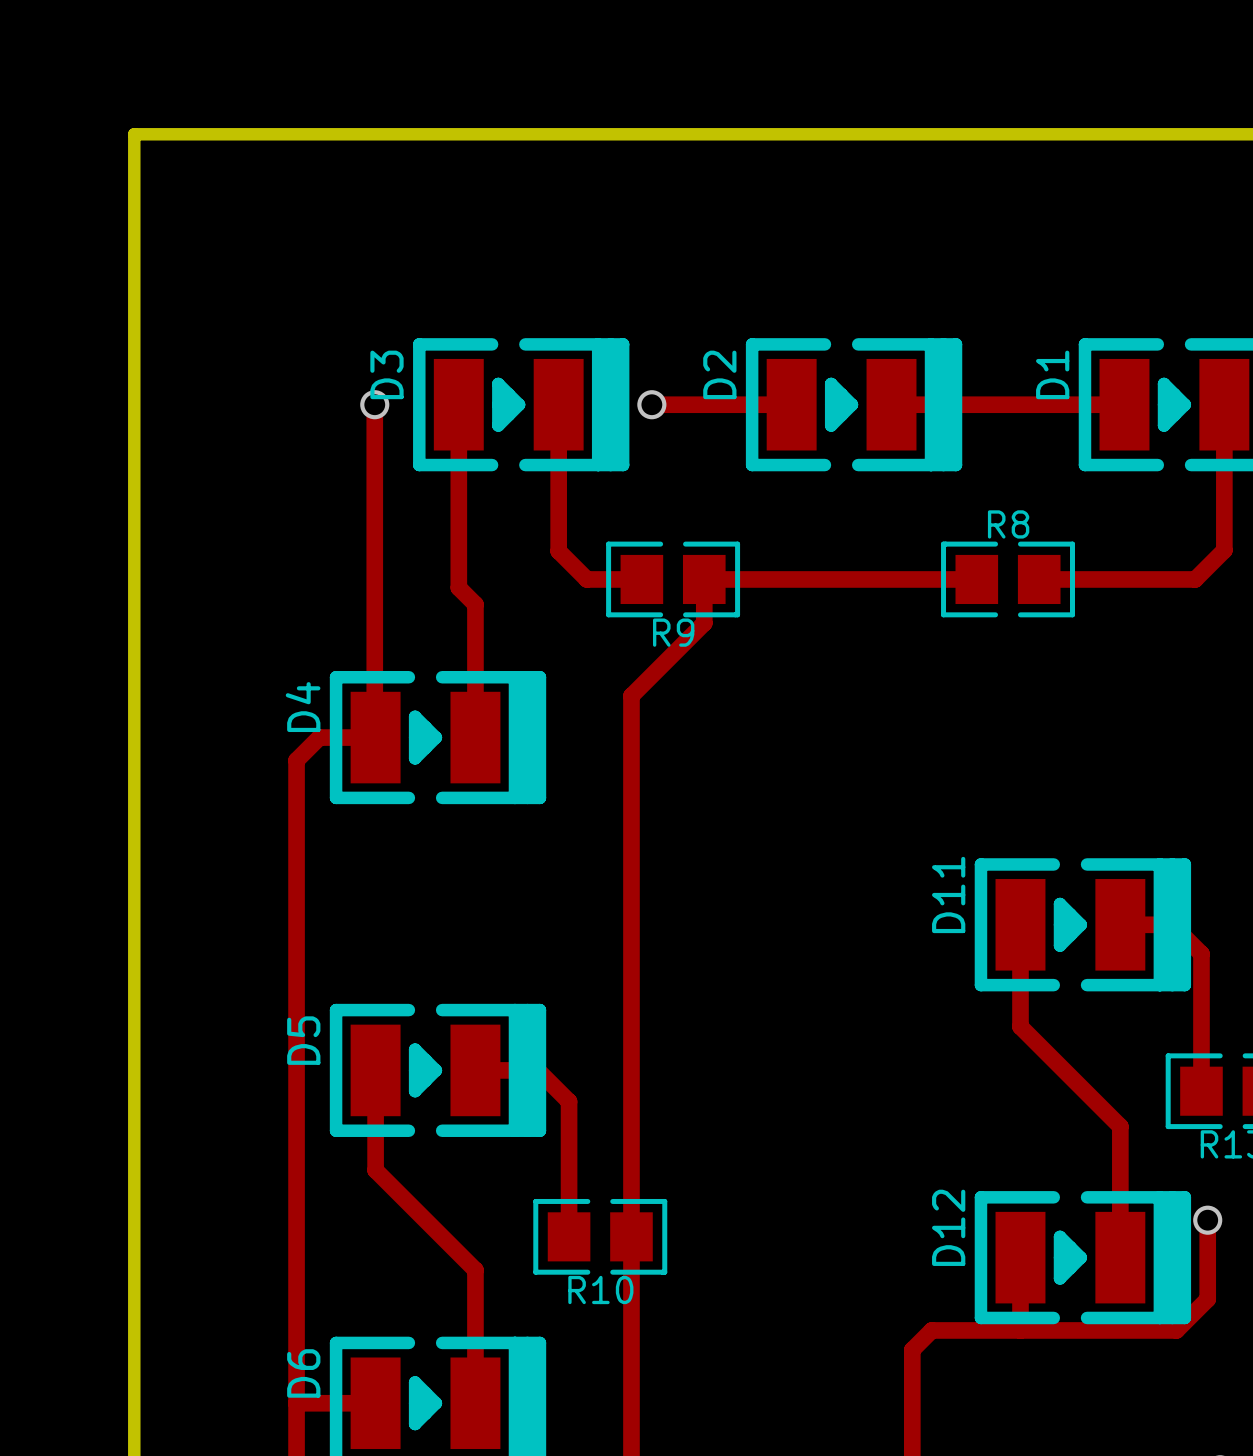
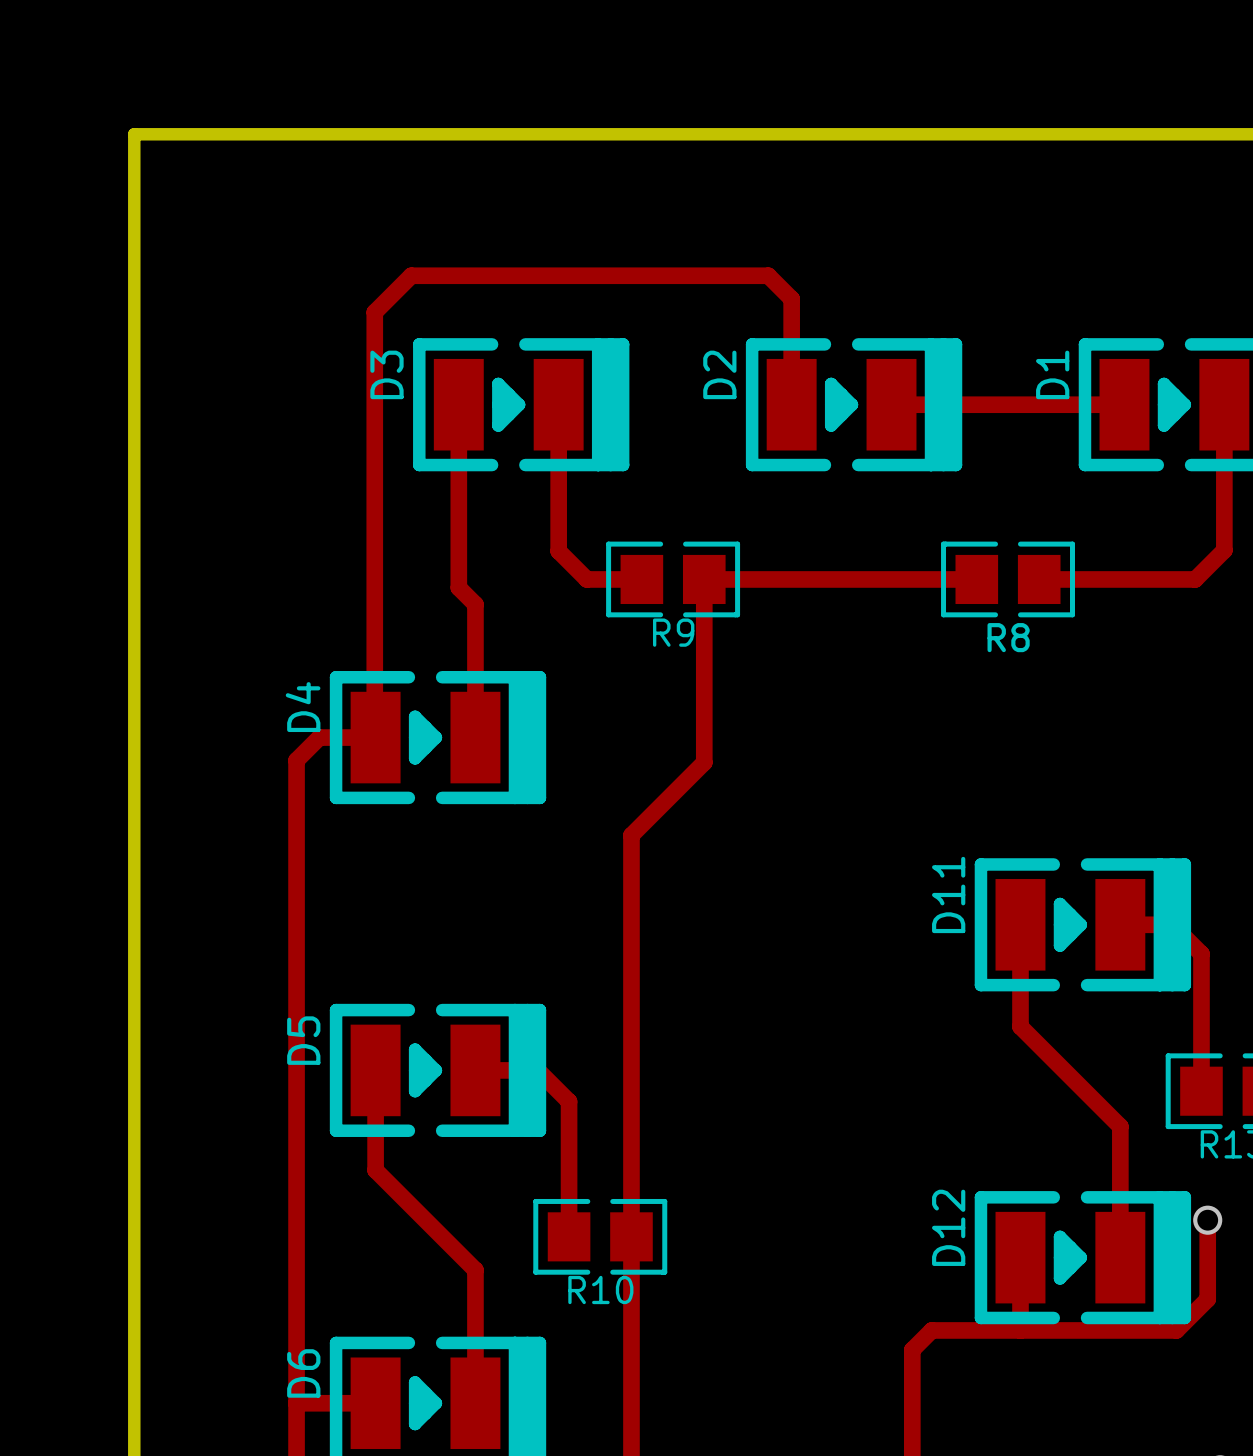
via: (374, 404) -> none
track: (651, 404) (791, 404) -> (374, 404) (374, 312) (411, 275) (768, 275) (791, 299) (791, 404)
via: (651, 404) -> none
R8 name position: R8 (1008, 524) -> R8 (1008, 637)
track: (704, 623) (631, 695) (631, 835) -> (704, 623) (704, 762) (631, 835)

